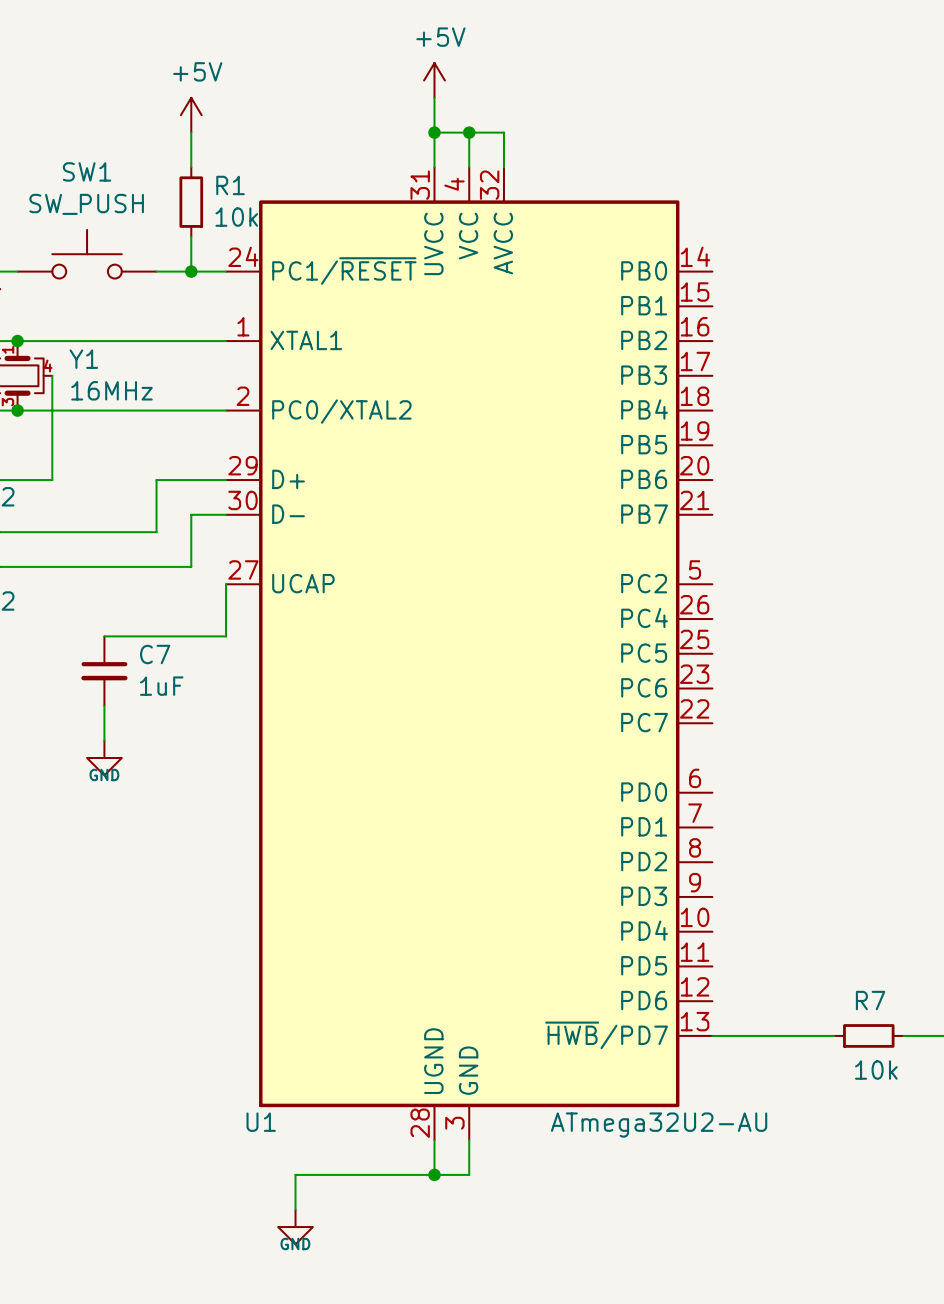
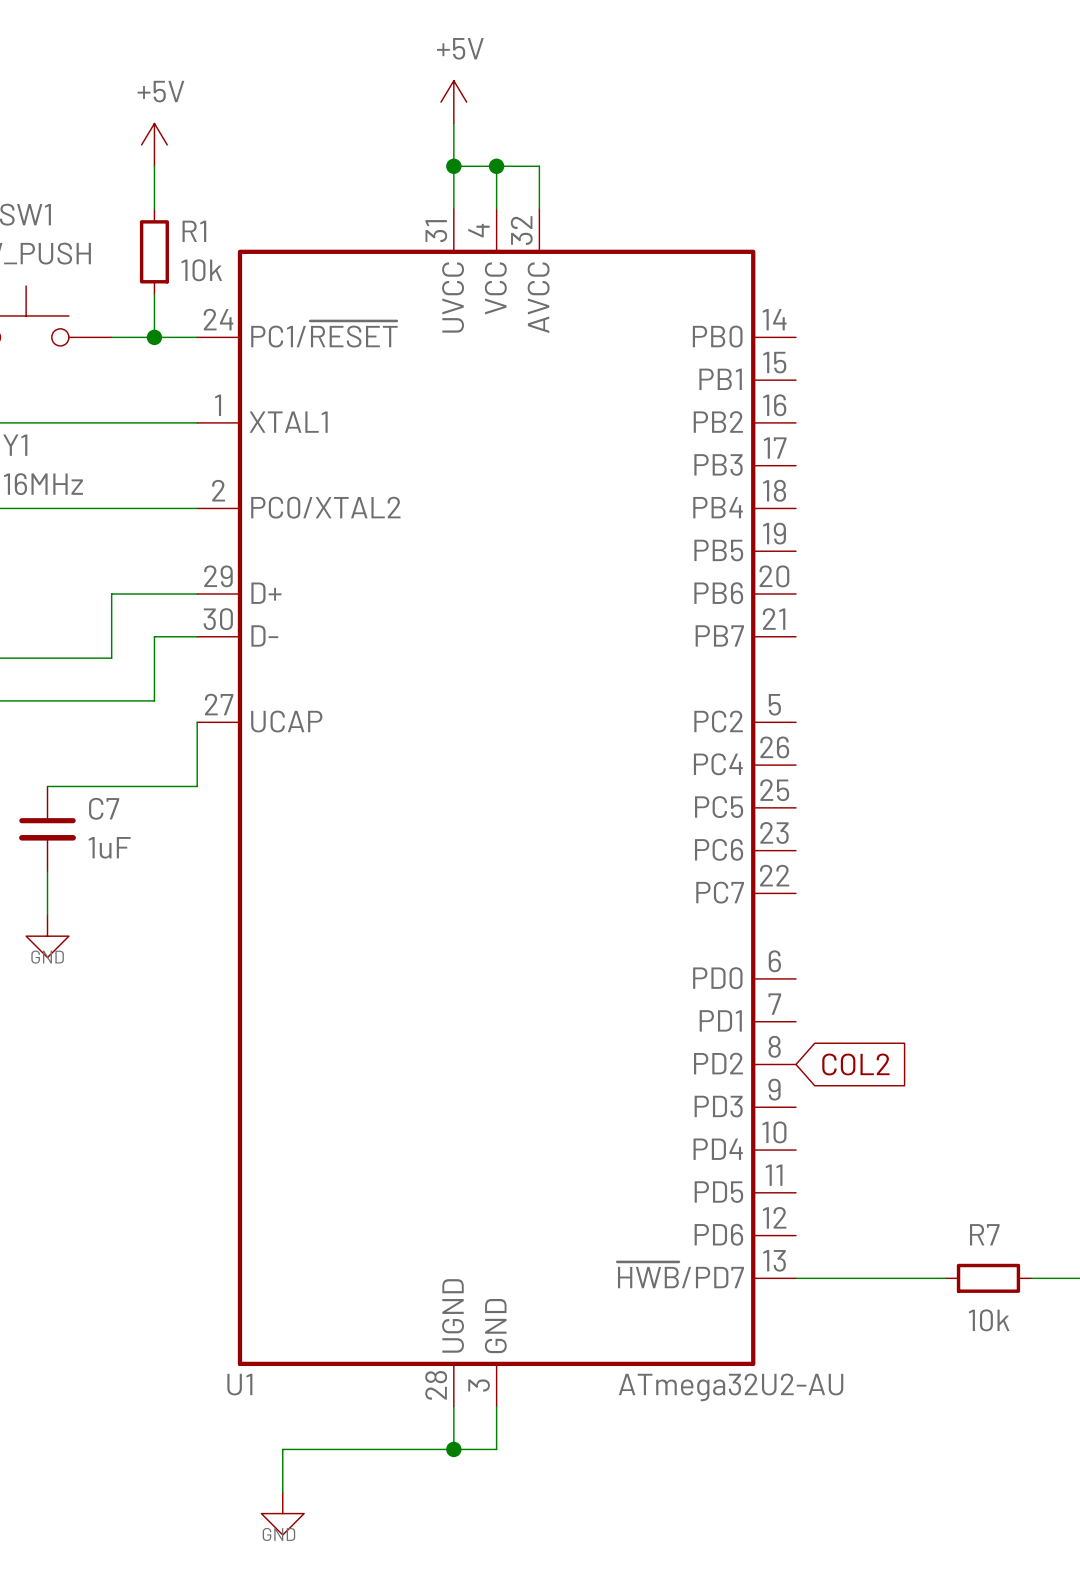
global label: none -> COL2 (855, 1064)

